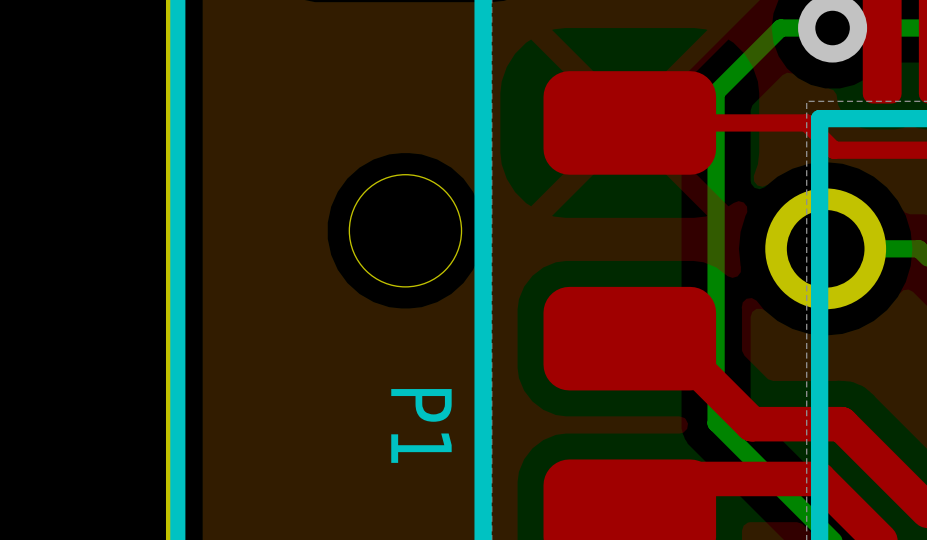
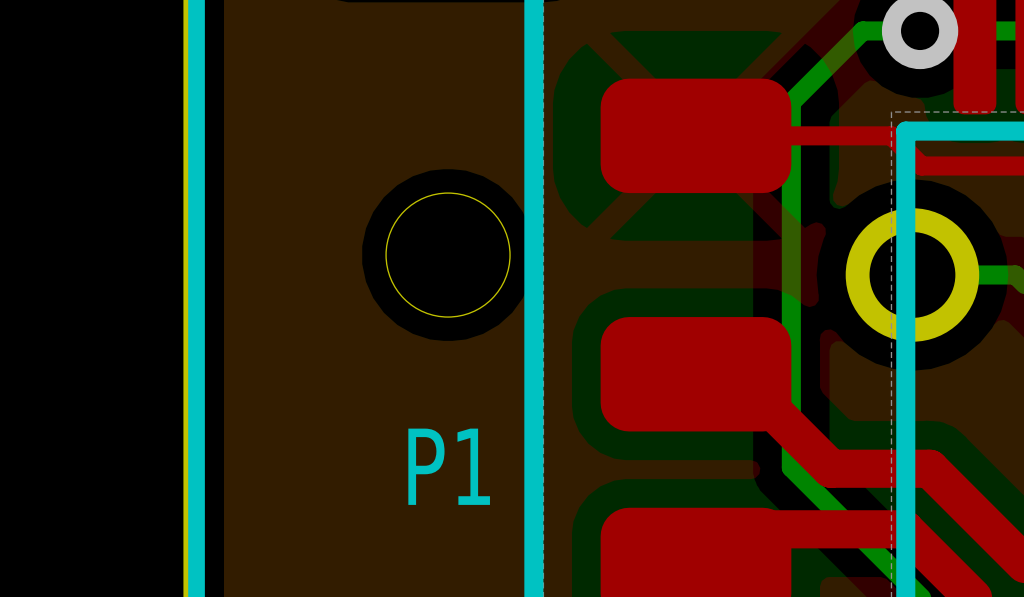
P1 name rotation: 0° (421, 425) -> 90° counterclockwise (449, 466)

